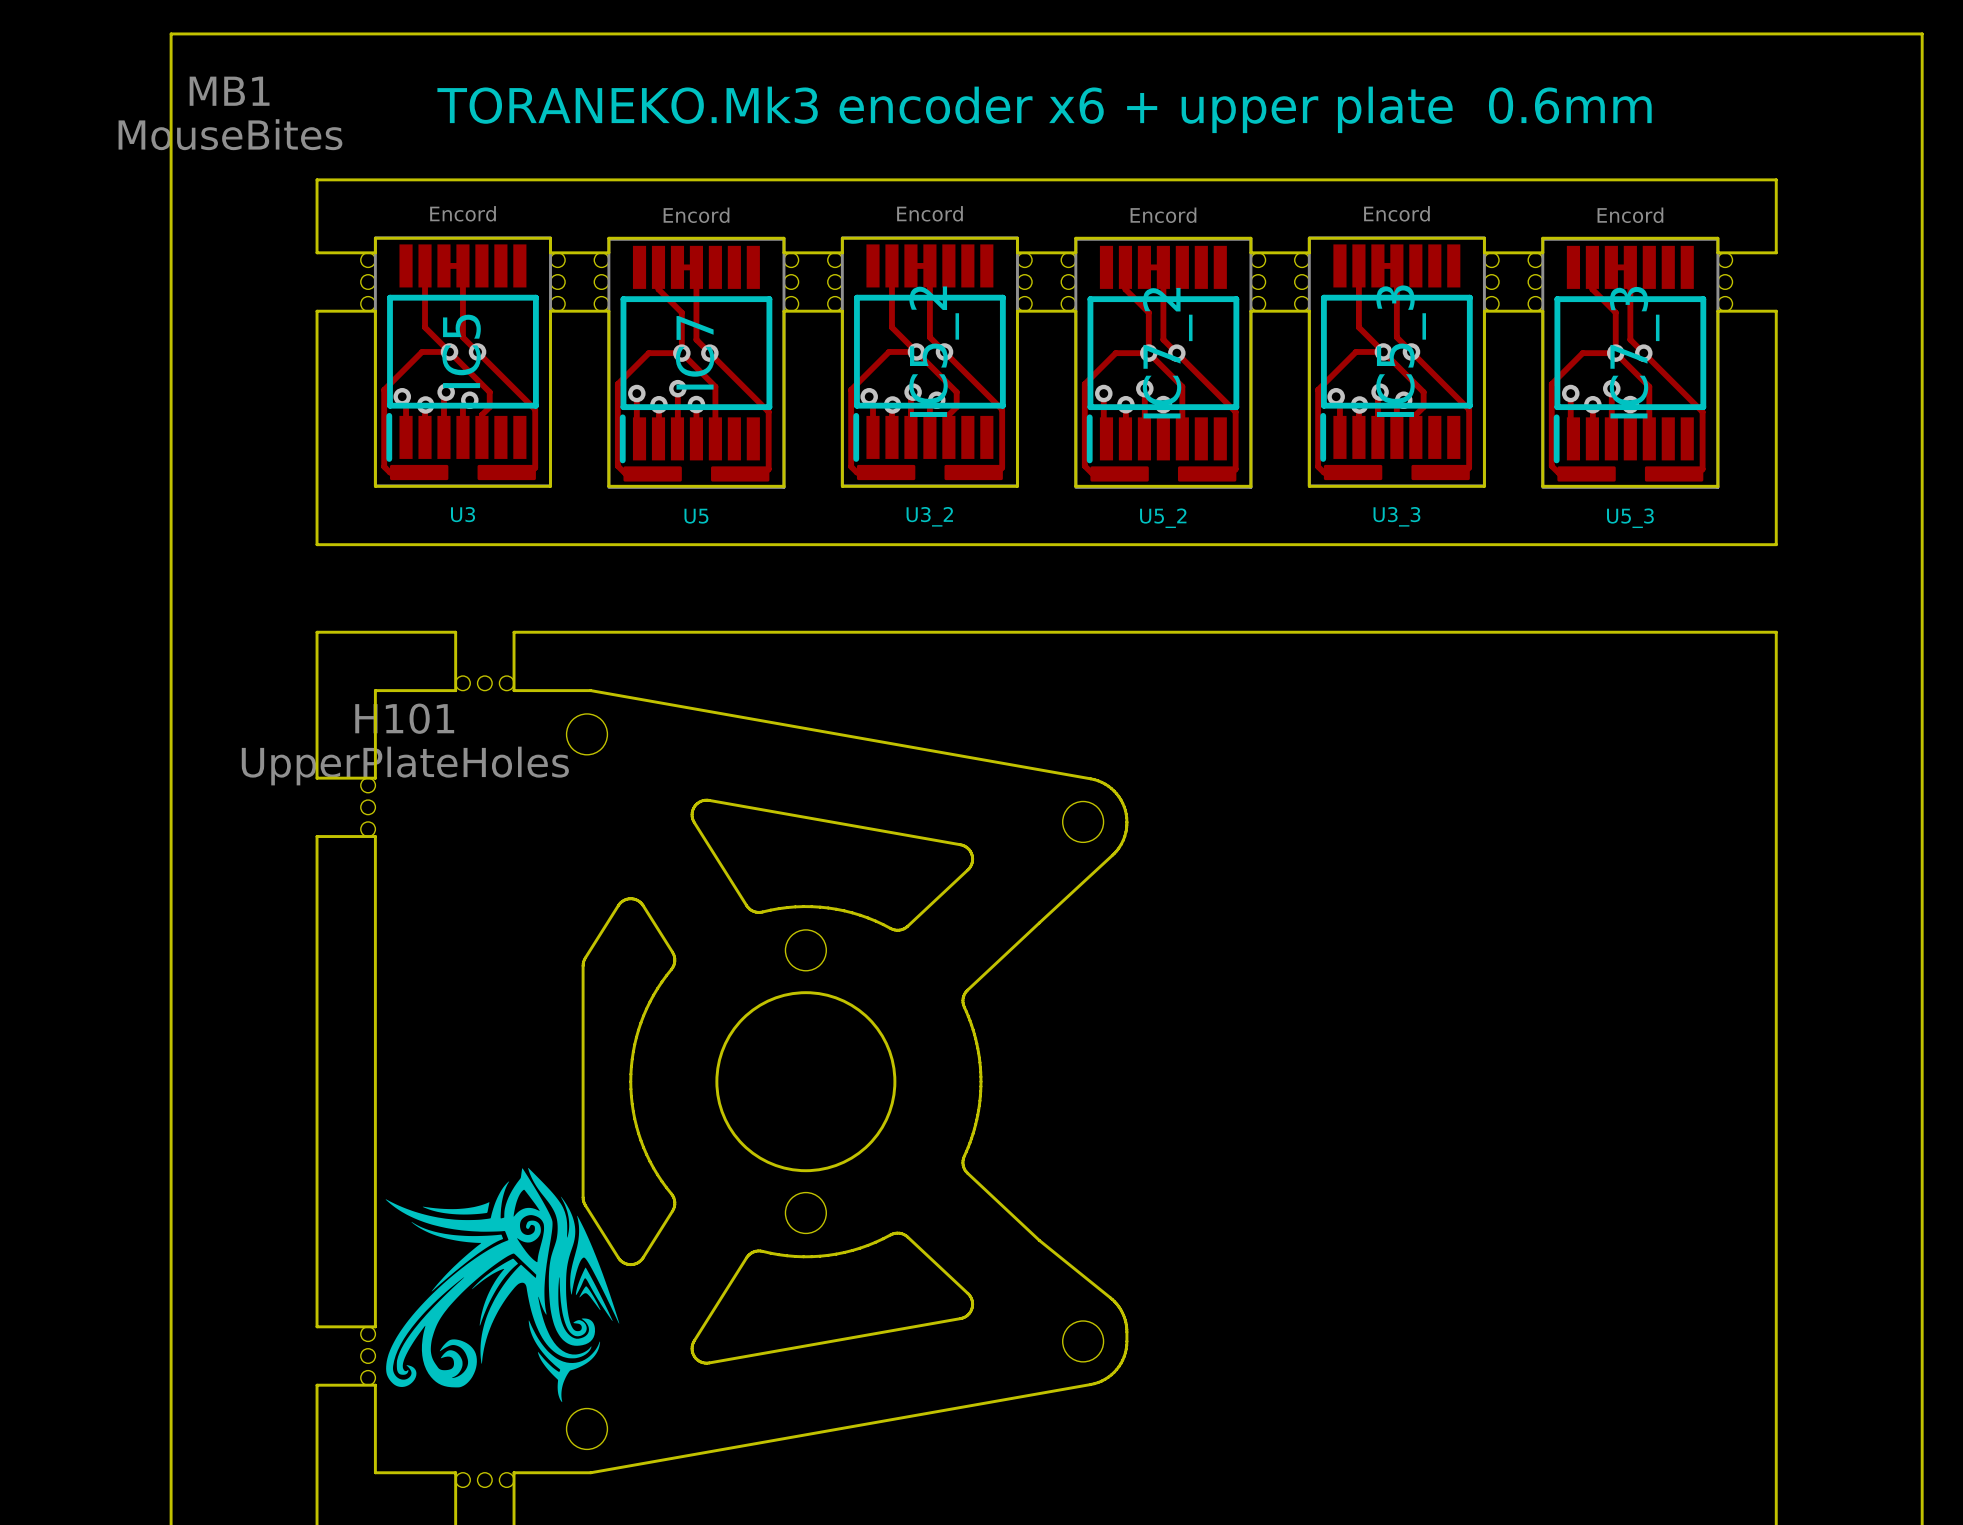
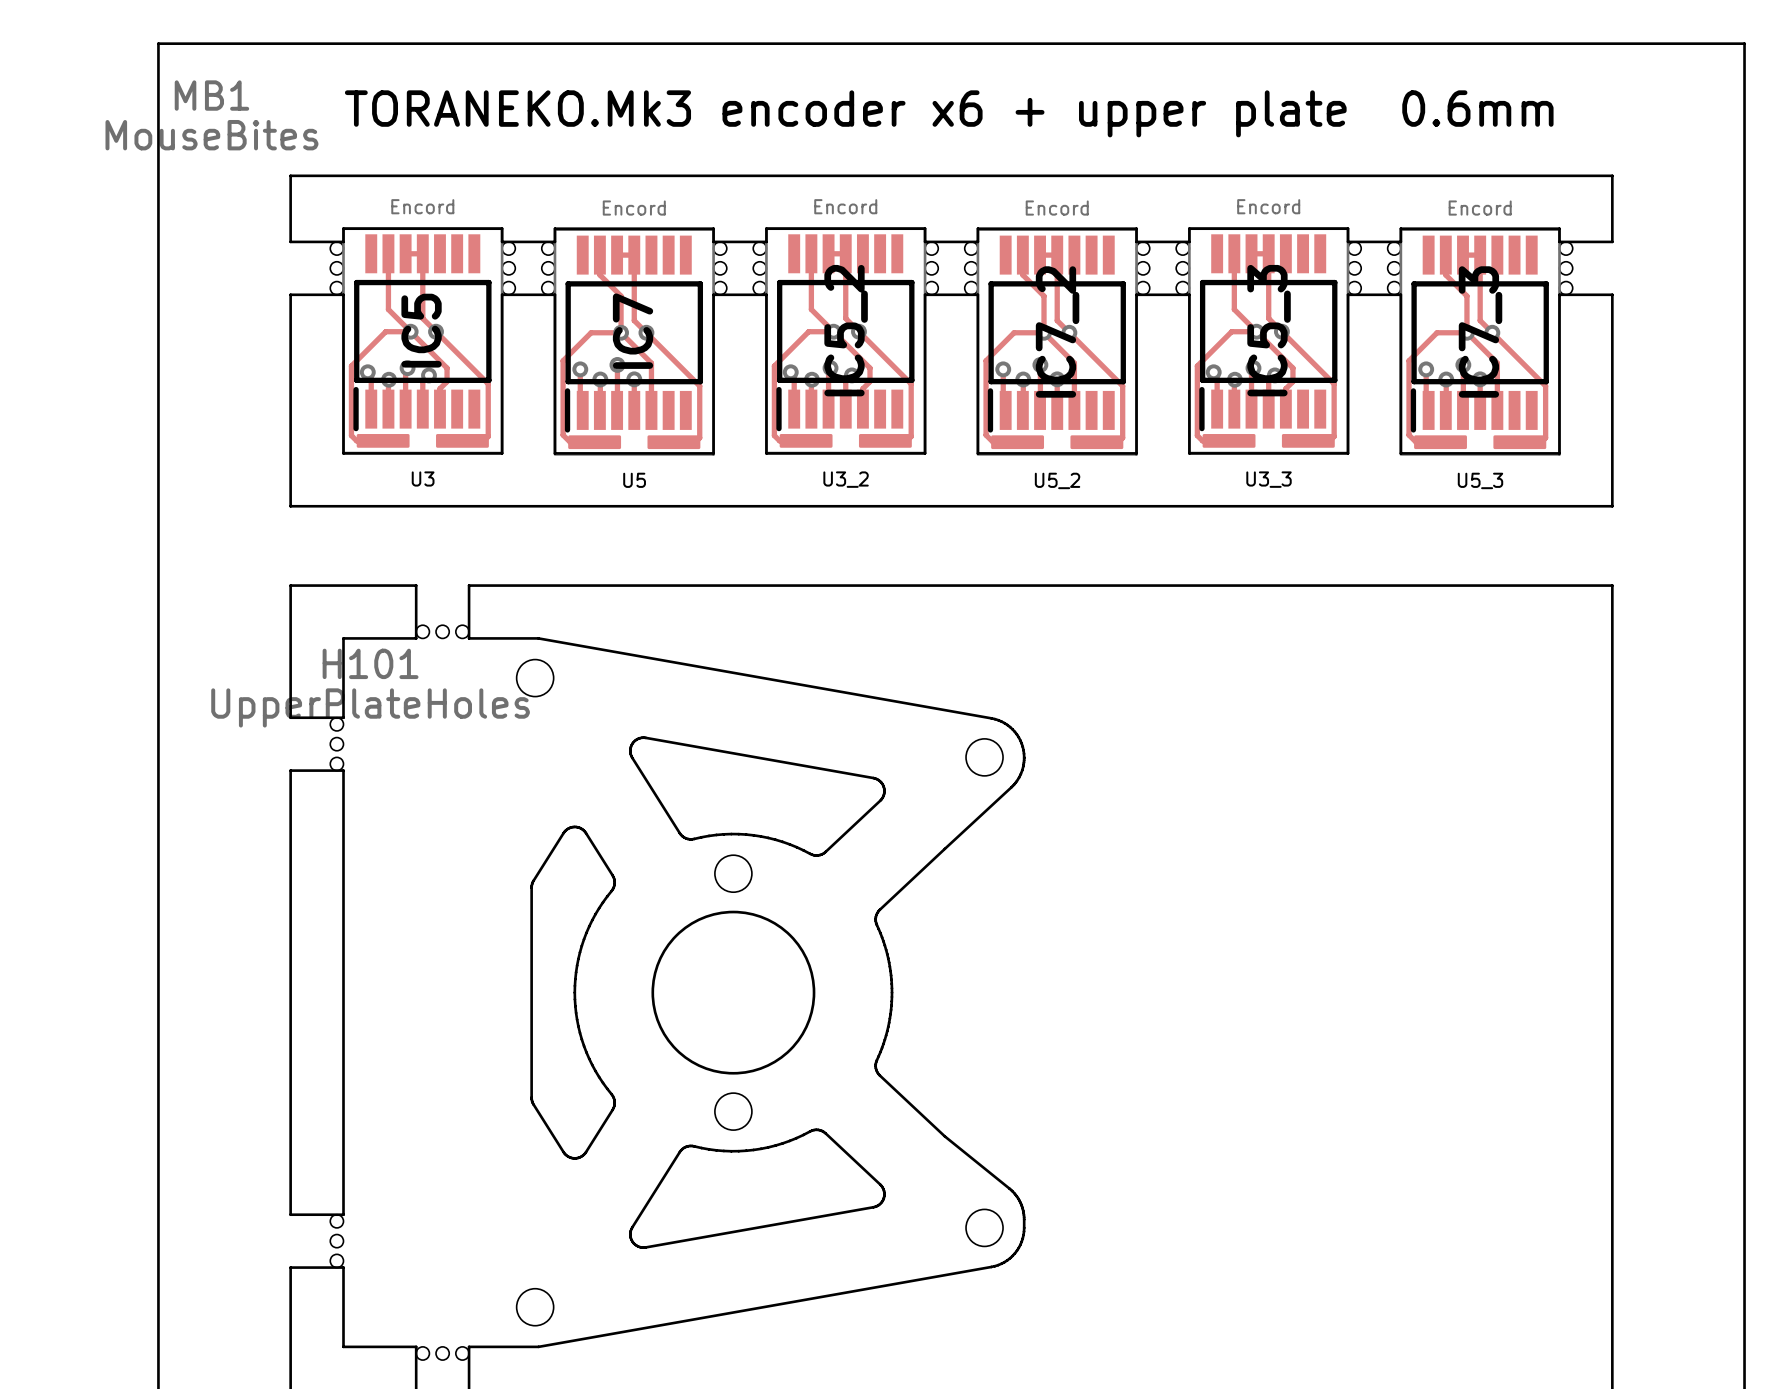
drawing: [385, 1167, 620, 1403] -> none

